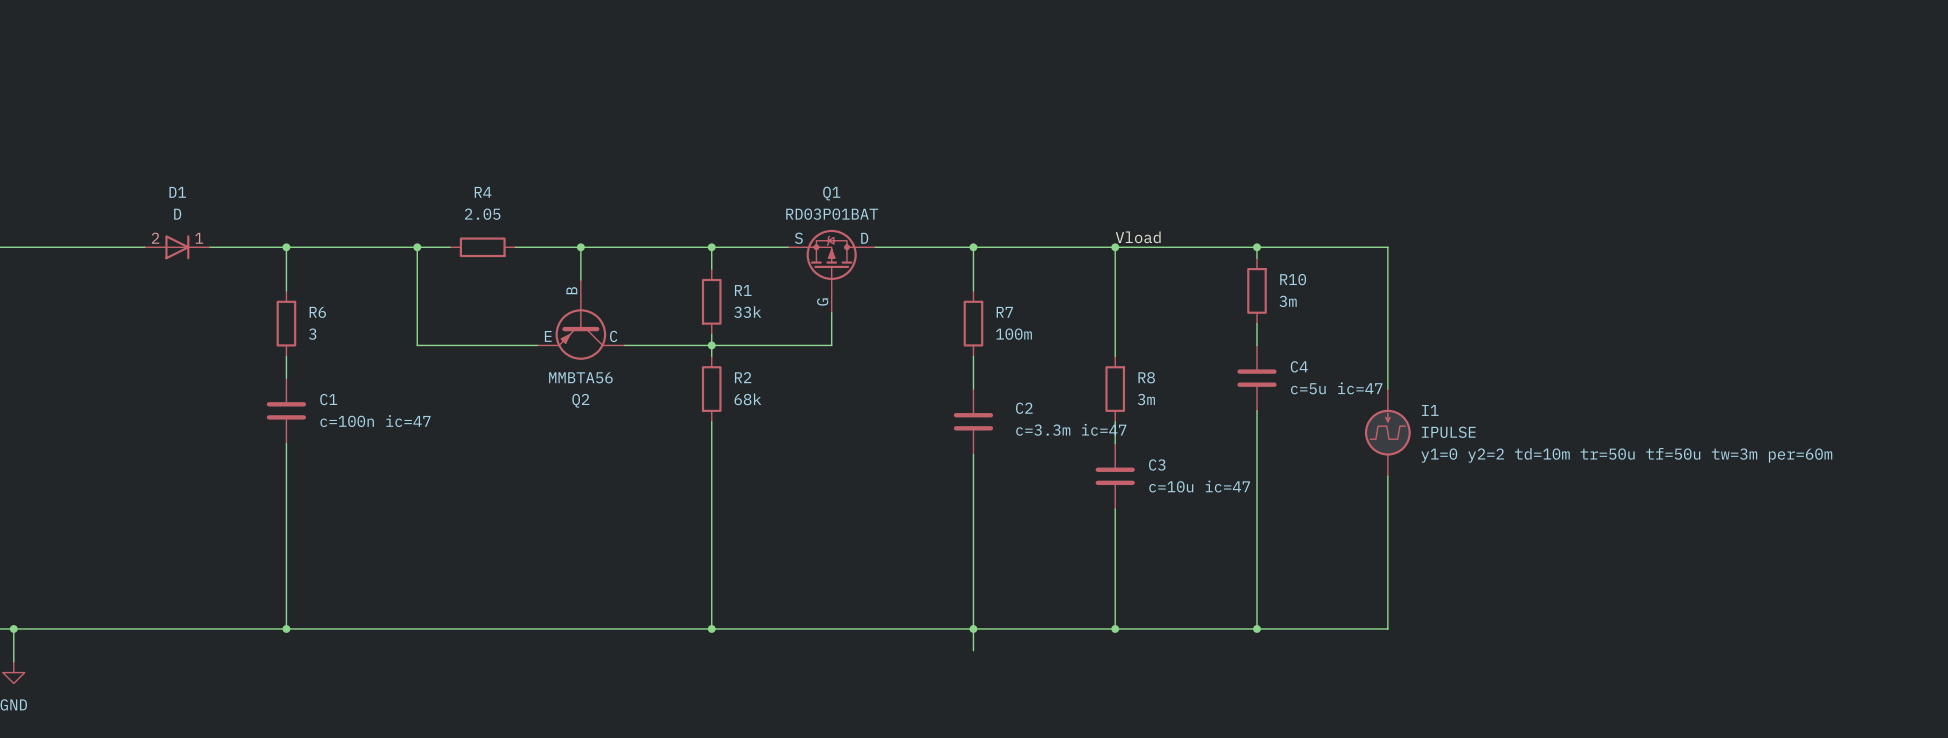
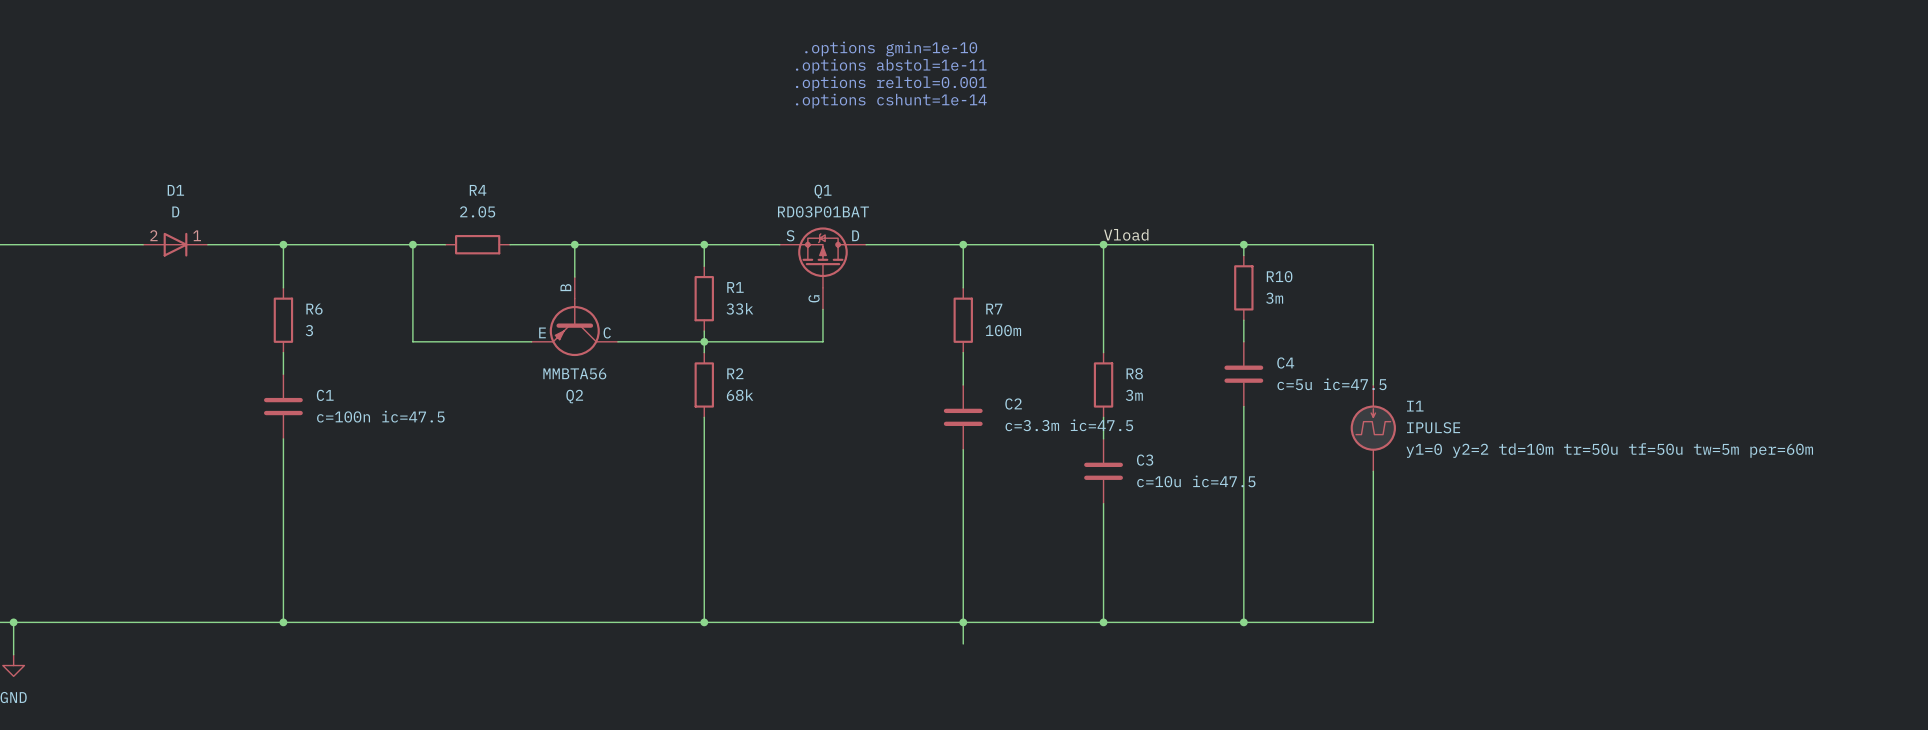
text: none -> .options gmin=1e-10 (891, 49)
text: none -> .options abstol=1e-11 (891, 66)
text: none -> .options reltol=0.001 (891, 83)
text: none -> .options cshunt=1e-14 (891, 101)
C4 value: c=5u ic=47 (1336, 388) -> c=5u ic=47.5 (1331, 384)
C1 value: c=100n ic=47 (375, 421) -> c=100n ic=47.5 (380, 416)
C2 value: c=3.3m ic=47 (1071, 429) -> c=3.3m ic=47.5 (1069, 425)
I1 text: y1=0 y2=2 td=10m tr=50u tf=50u tw=3m per=60m (1626, 455) -> y1=0 y2=2 td=10m tr=50u tf=50u tw=5m per=60m (1609, 450)
C3 value: c=10u ic=47 (1199, 486) -> c=10u ic=47.5 (1196, 481)

